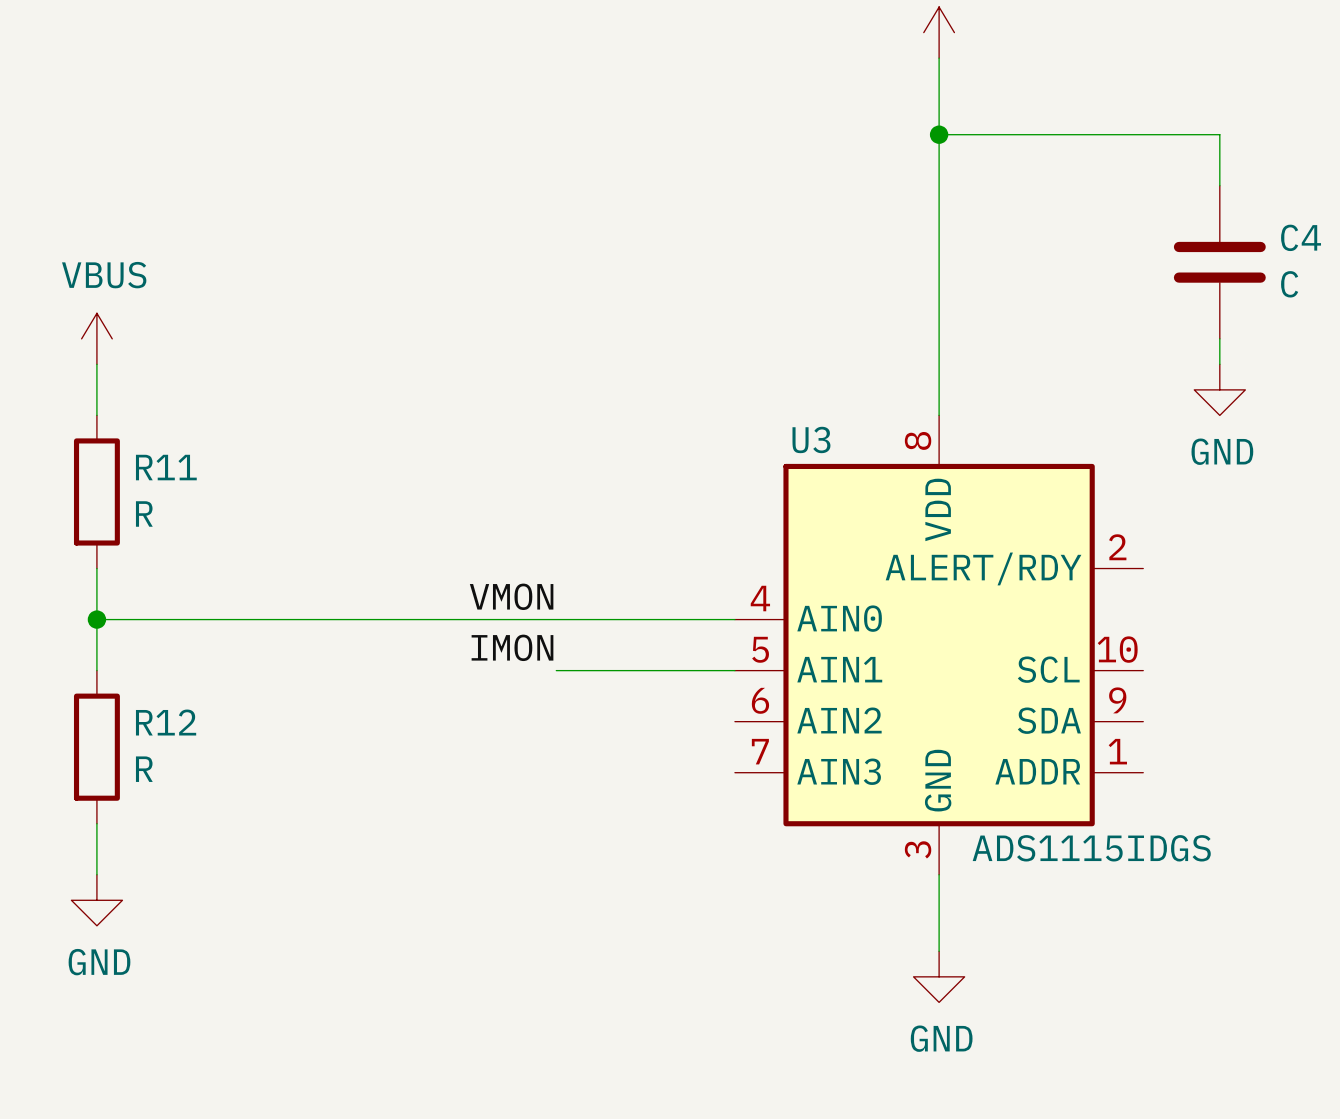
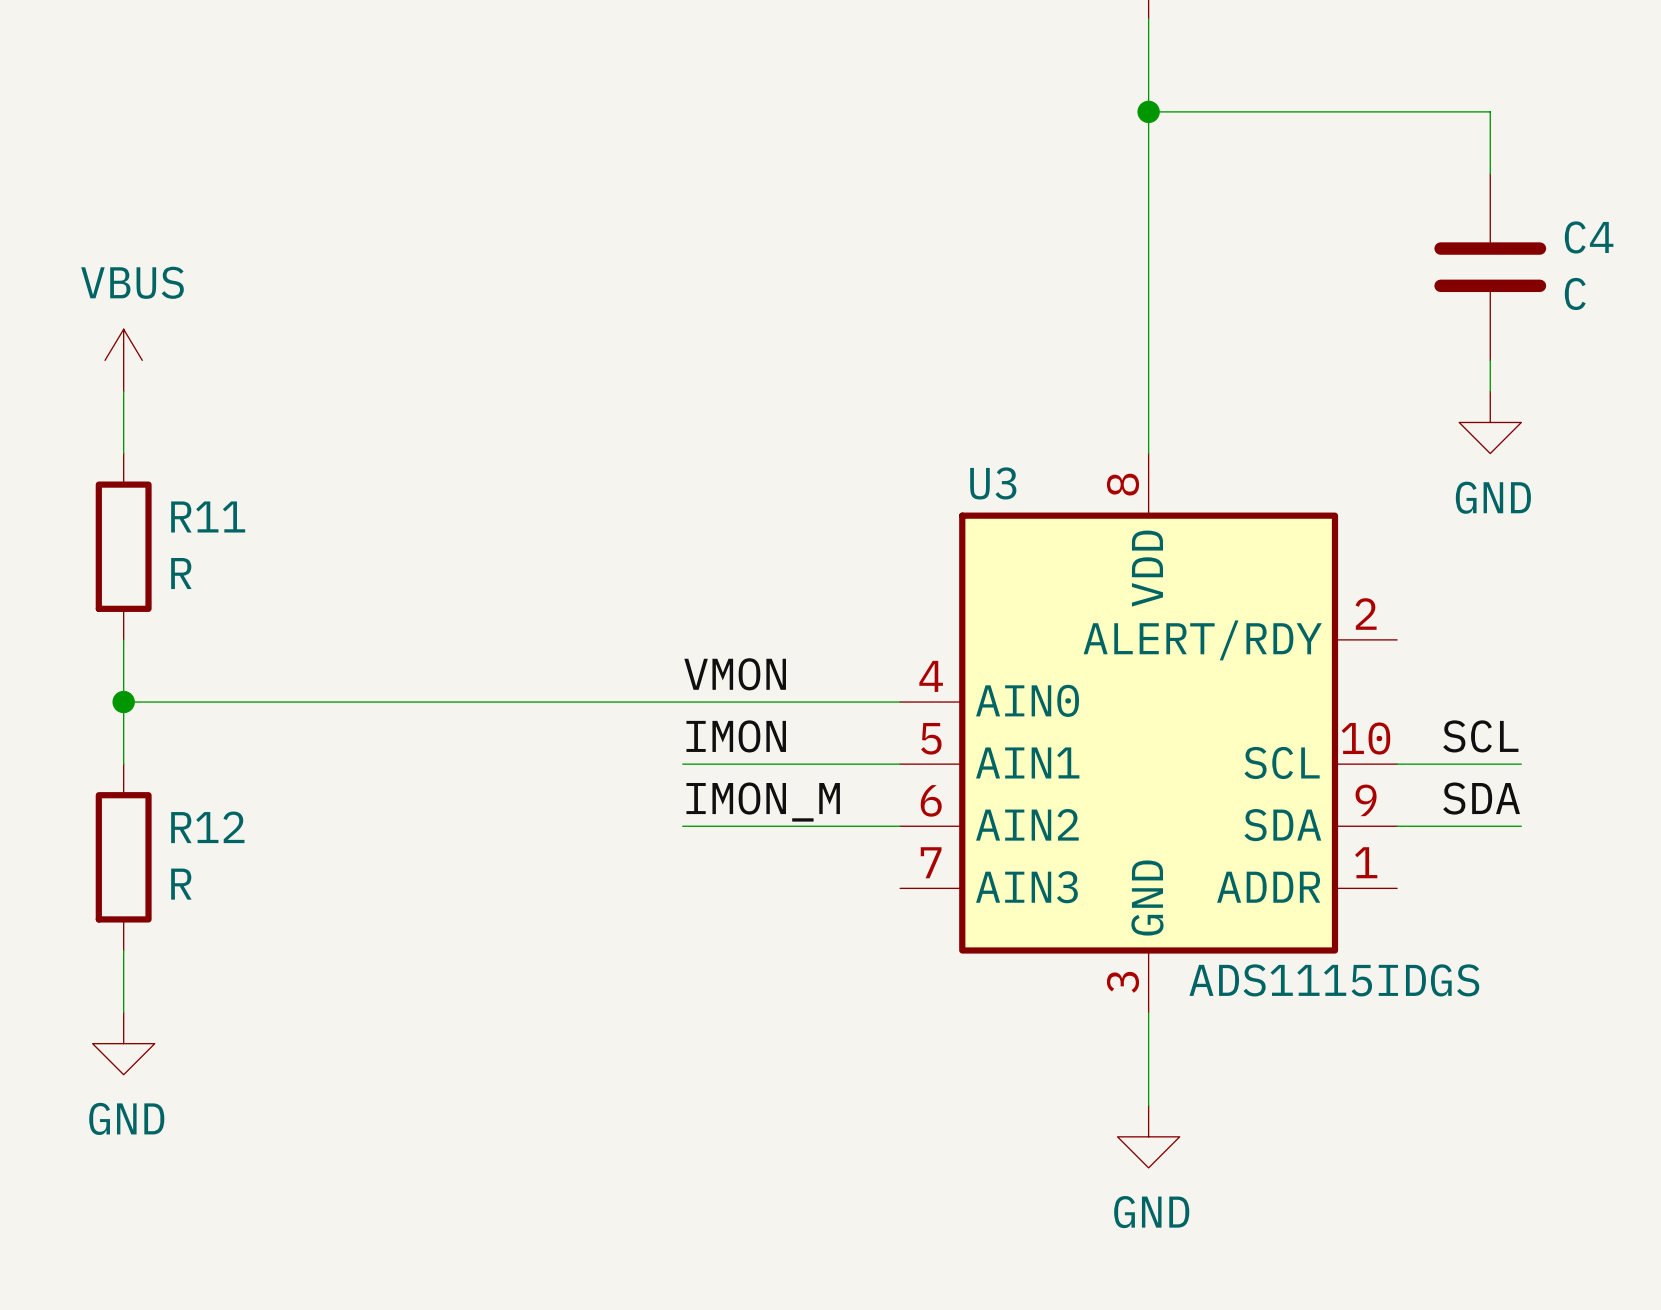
label position: VMON (511, 596) -> VMON (735, 674)
label position: IMON (512, 647) -> IMON (736, 736)
label: none -> SCL (1480, 736)
wire: none -> (1397, 764) (1521, 764)
label: none -> SDA (1481, 798)
label: none -> IMON_M (763, 802)
wire: none -> (682, 826) (900, 826)
wire: none -> (1397, 826) (1521, 826)

